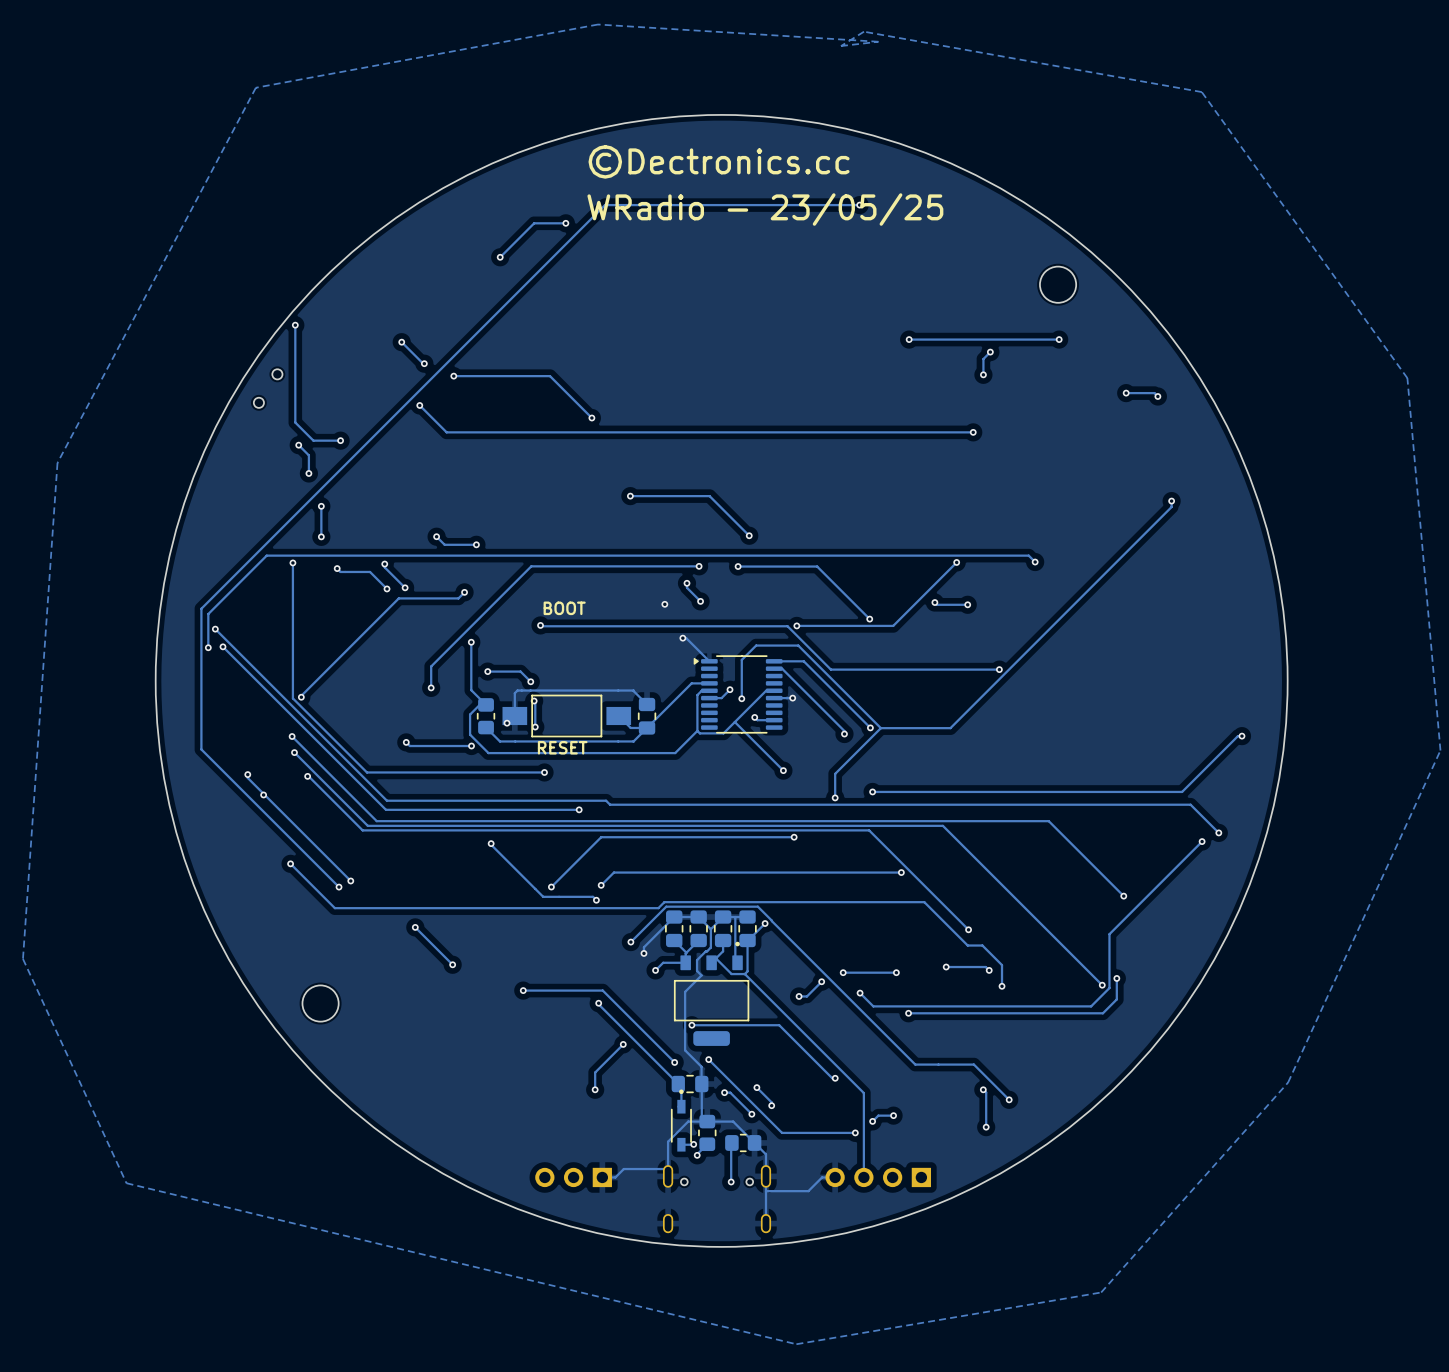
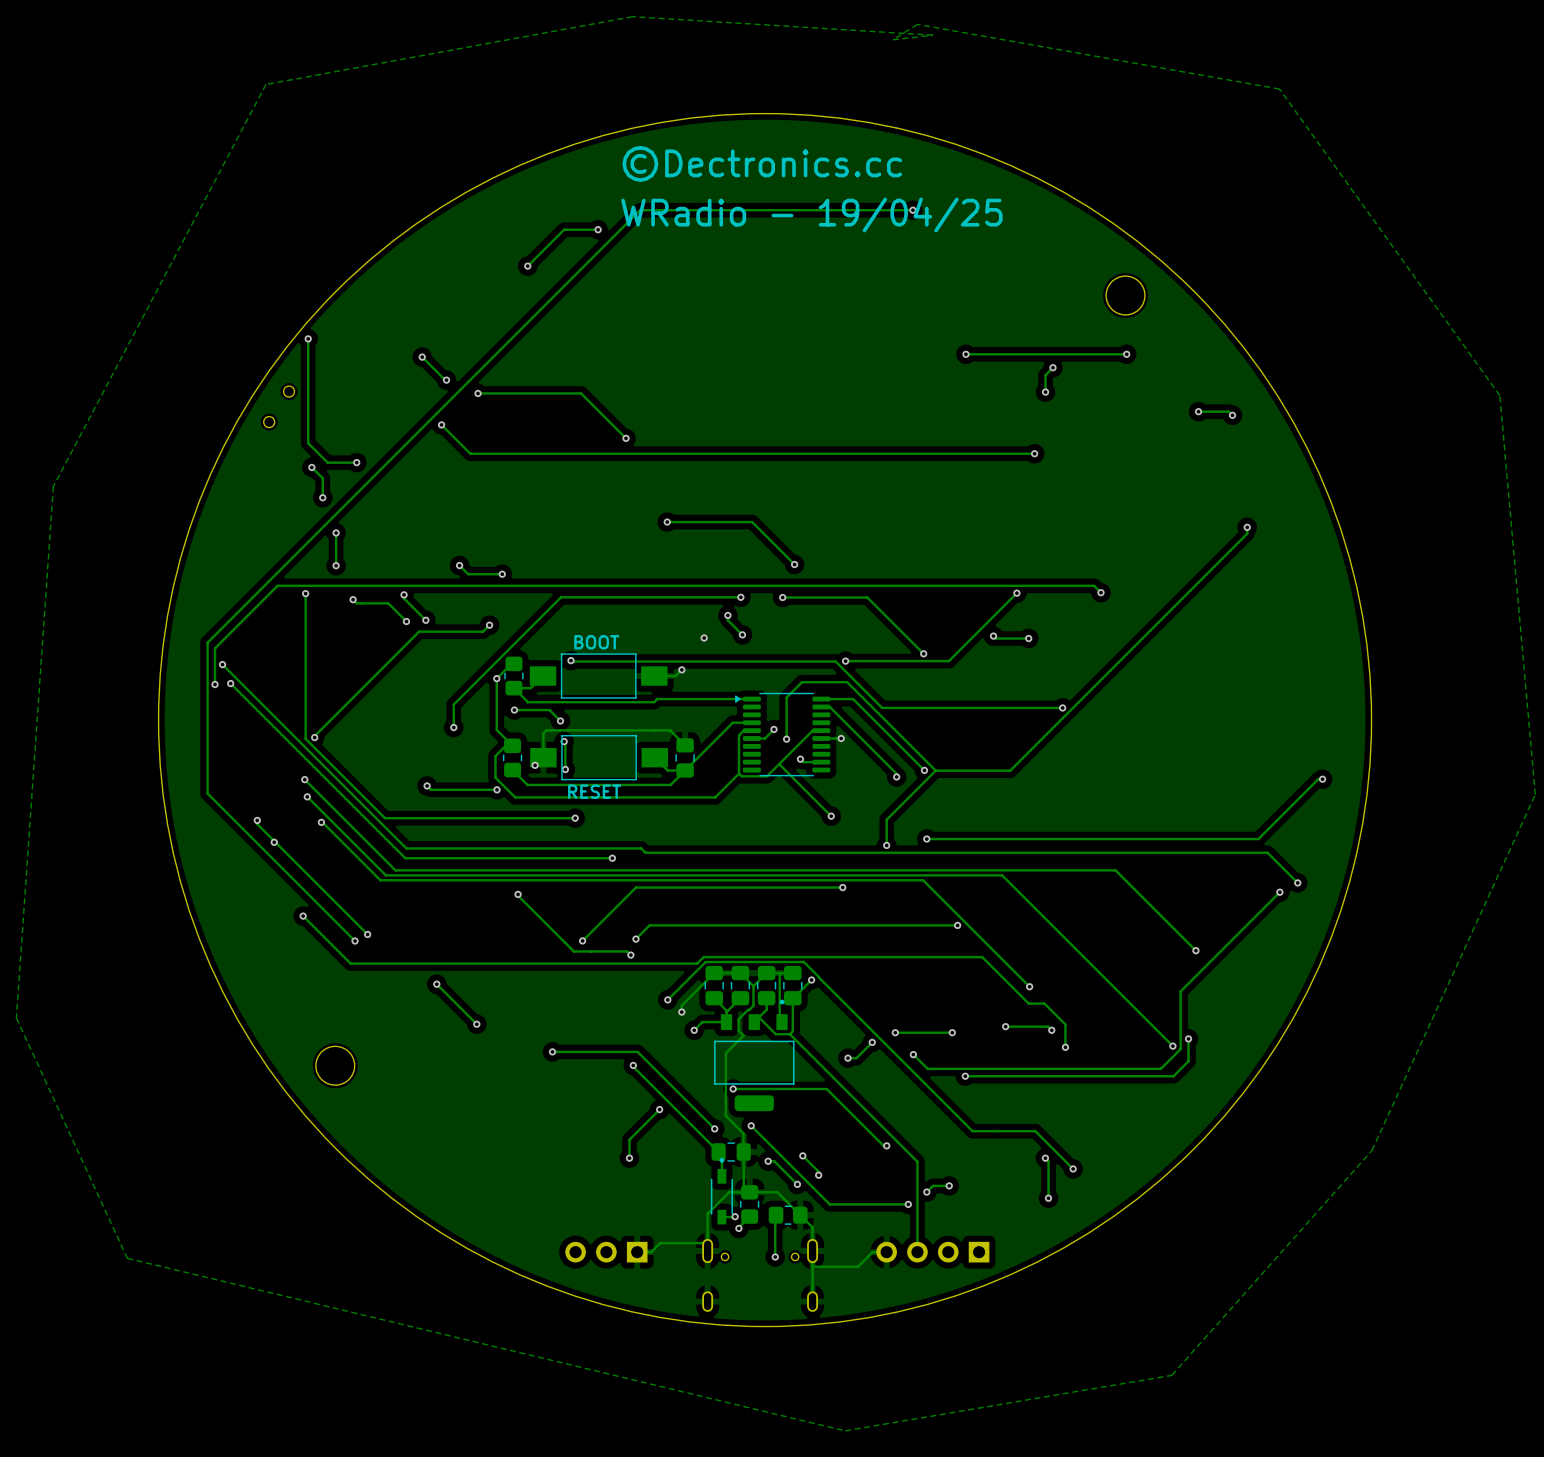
text: WRadio - 23/05/25 (765, 209) -> WRadio - 19/04/25 (811, 214)
track: none -> (513, 663) (511, 663) (496, 678)
track: none -> (681, 669) (675, 676) (654, 676)
track: (682, 638) (686, 638) (709, 661) -> (543, 676) (530, 688) (513, 688) (527, 702) (654, 702) (657, 699) (751, 699)
via position: (682, 638) -> (681, 669)
part: none -> (513, 676)
part: none -> (598, 676)

